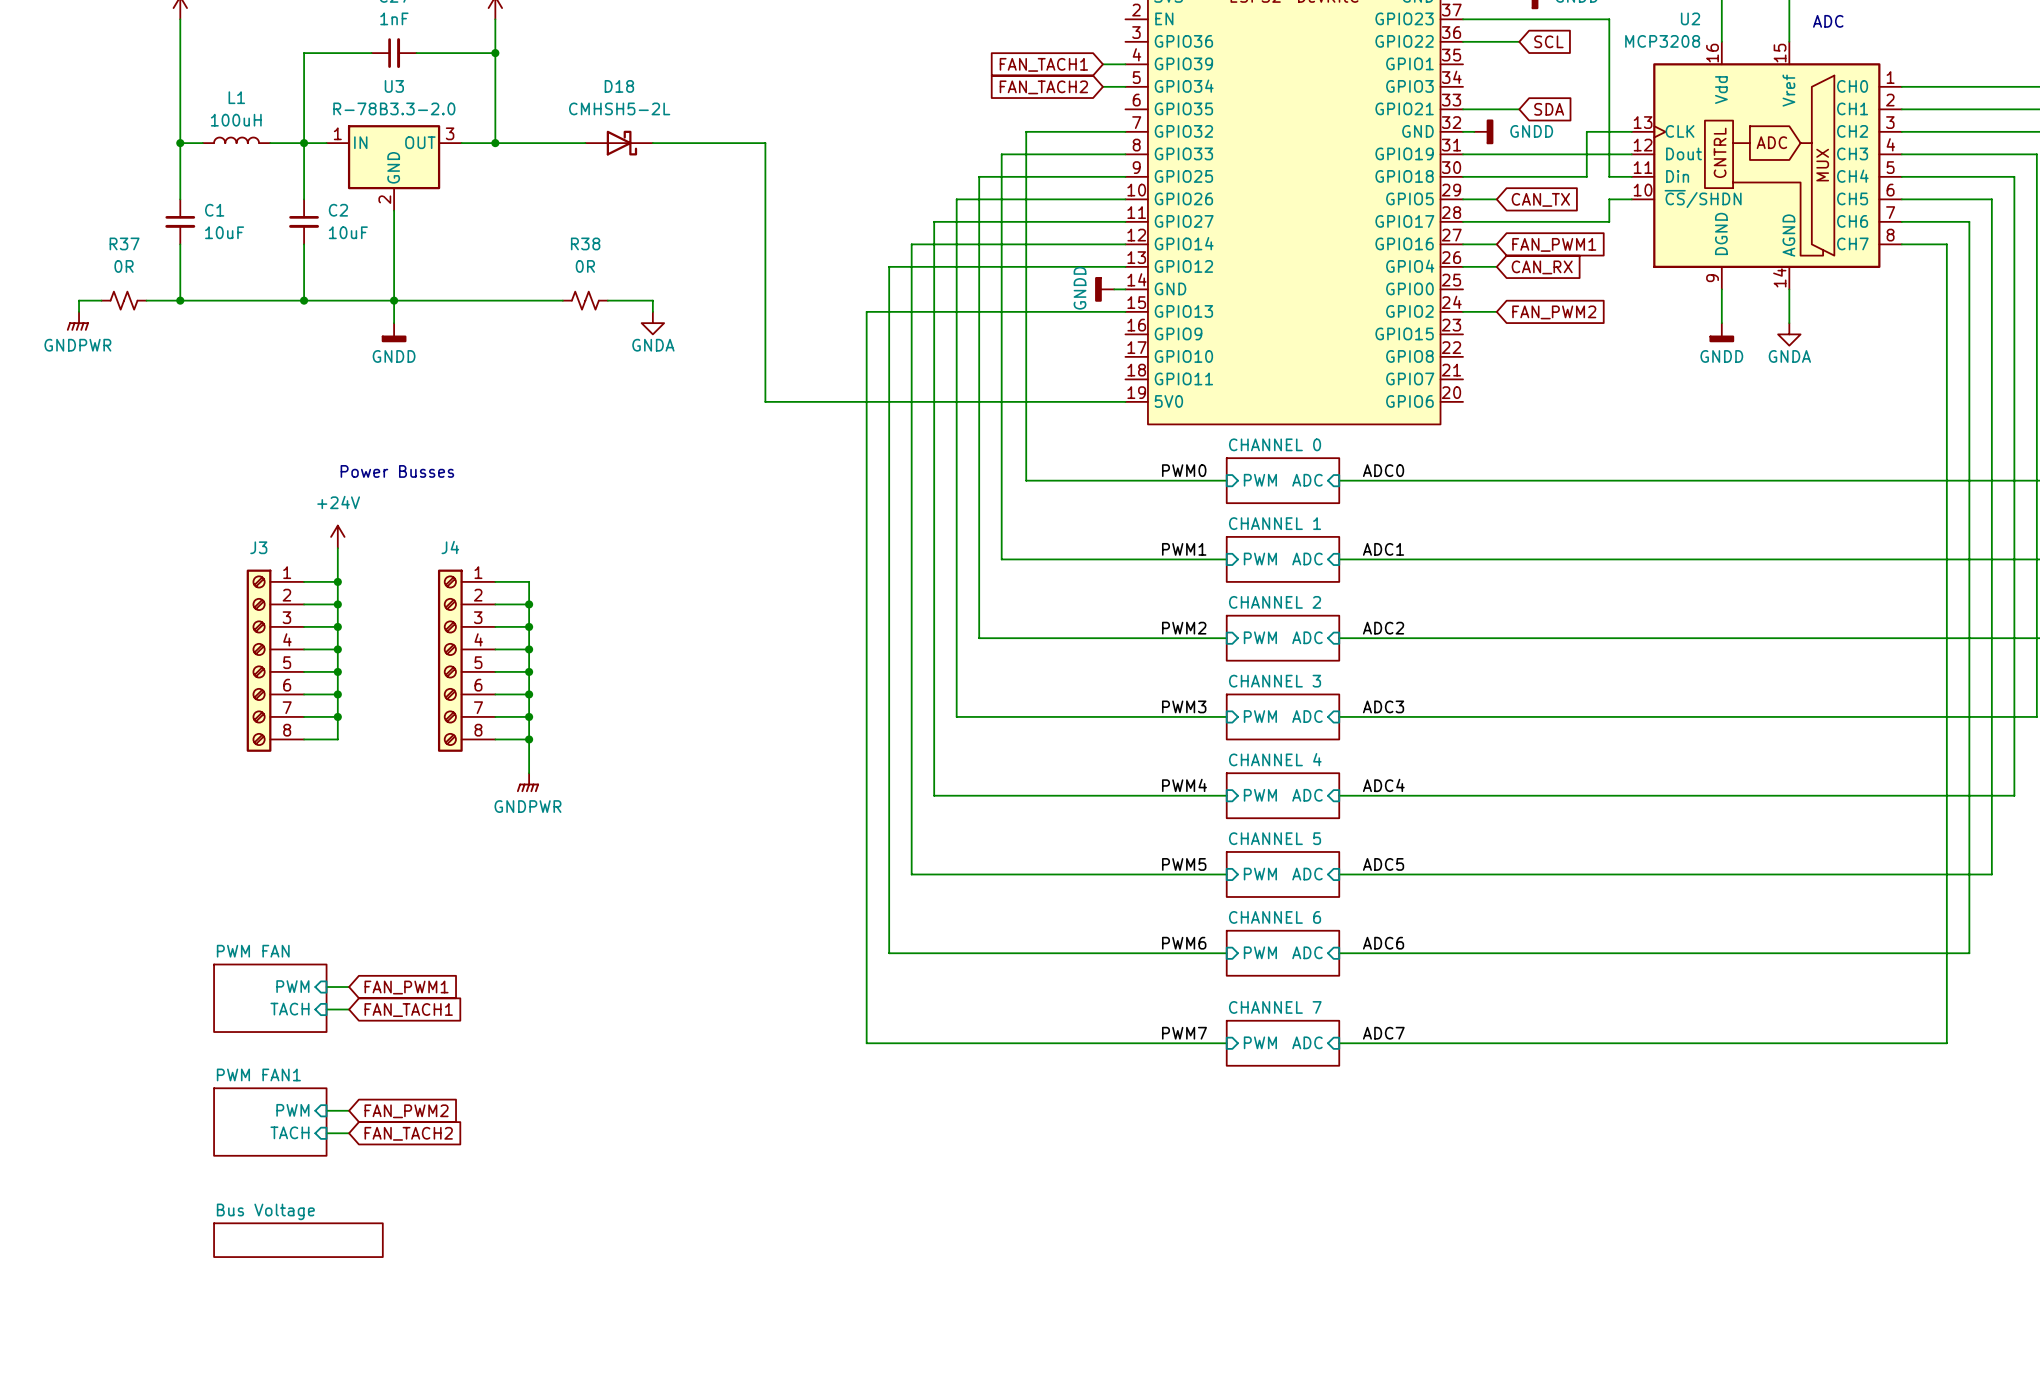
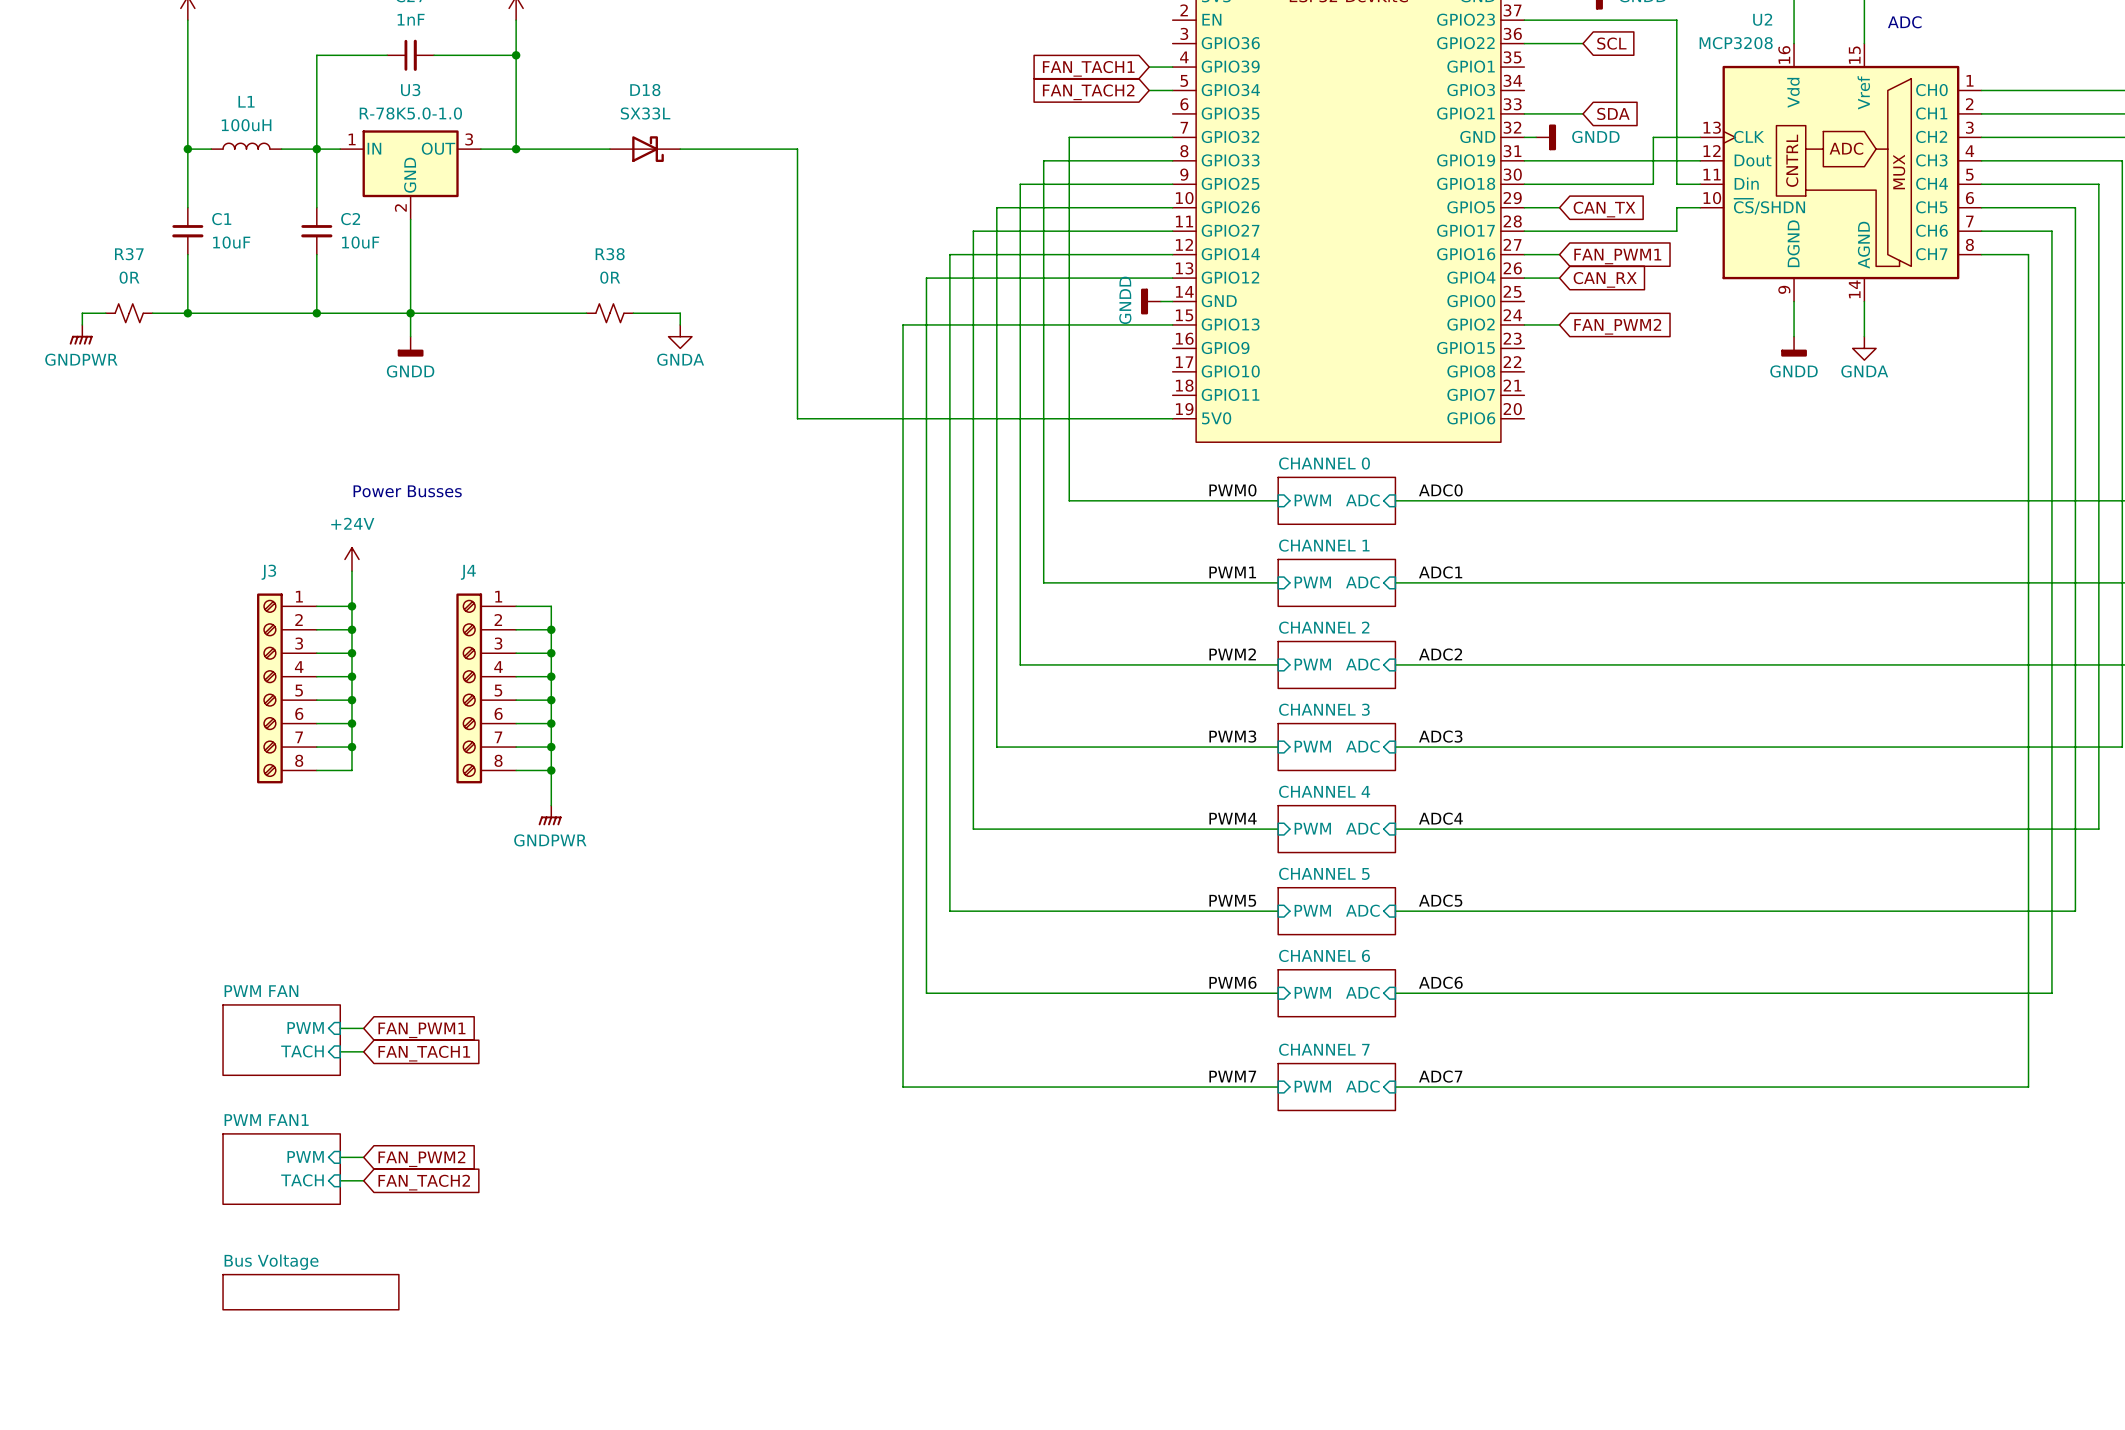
U3 value: R-78B3.3-2.0 (394, 108) -> R-78K5.0-1.0 (410, 113)
D18 value: CMHSH5-2L (619, 108) -> SX33L (645, 113)

